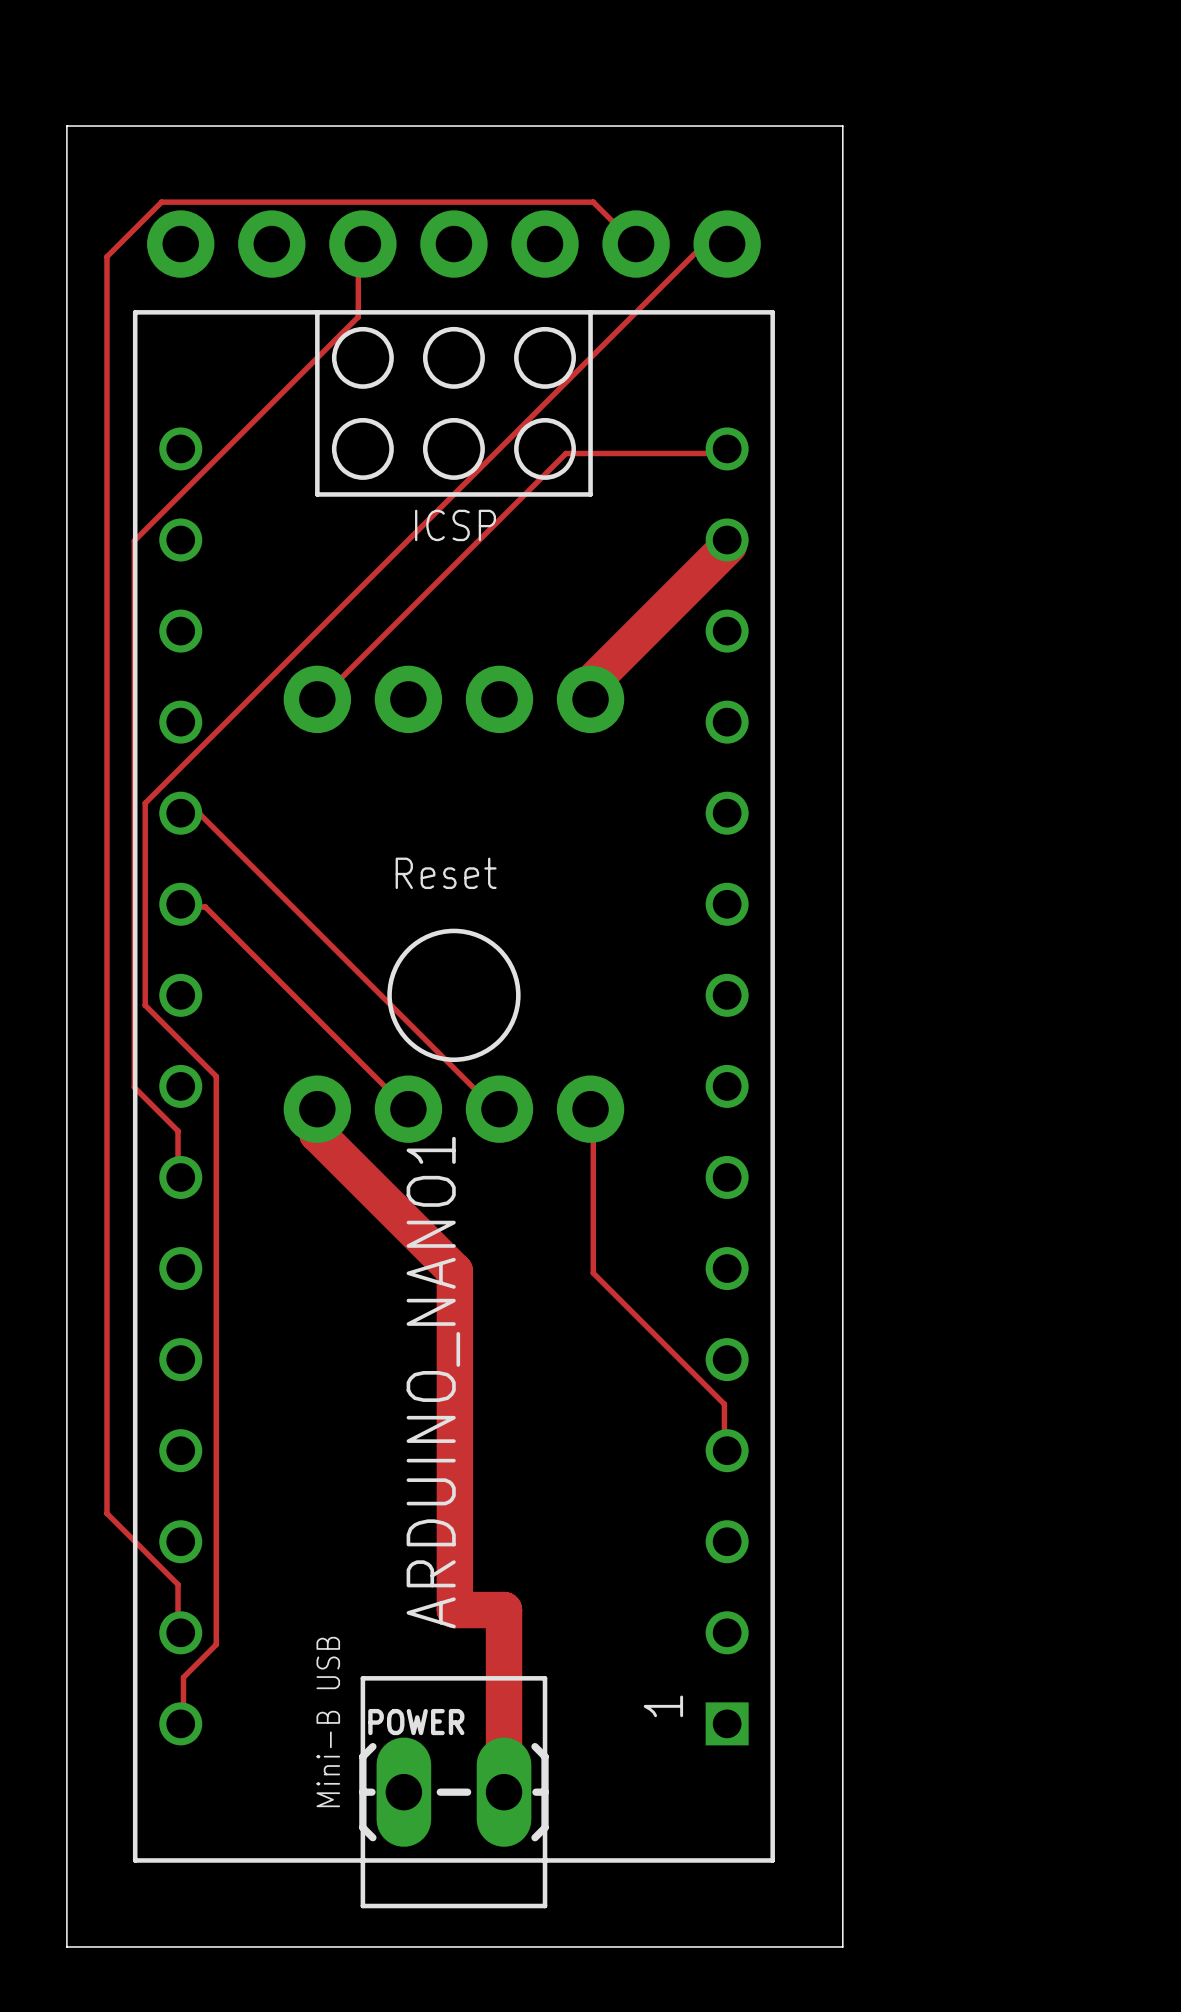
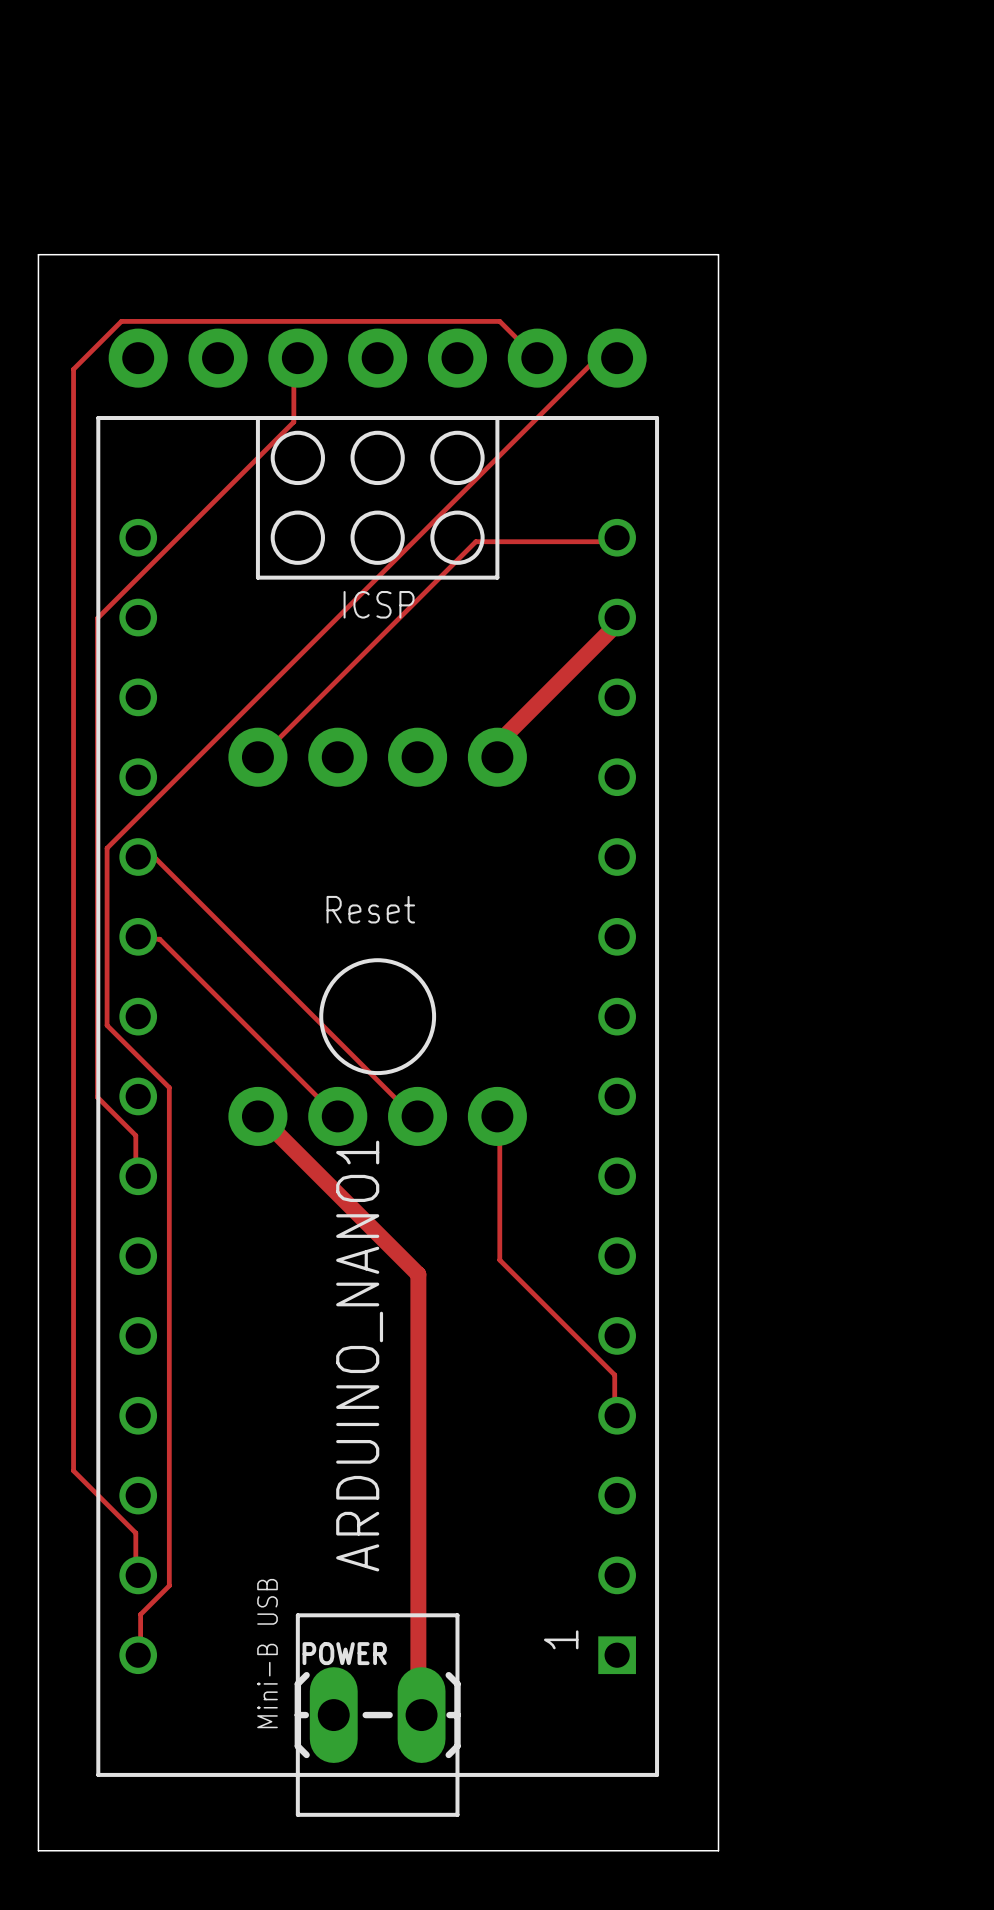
track width: thick (728, 545) (590, 683) -> thin (618, 622) (497, 743)
track: (317, 1109) (317, 1133) (454, 1271) (454, 1610) (504, 1610) (504, 1792) -> (257, 1116) (260, 1116) (418, 1274) (418, 1715) (421, 1715)

